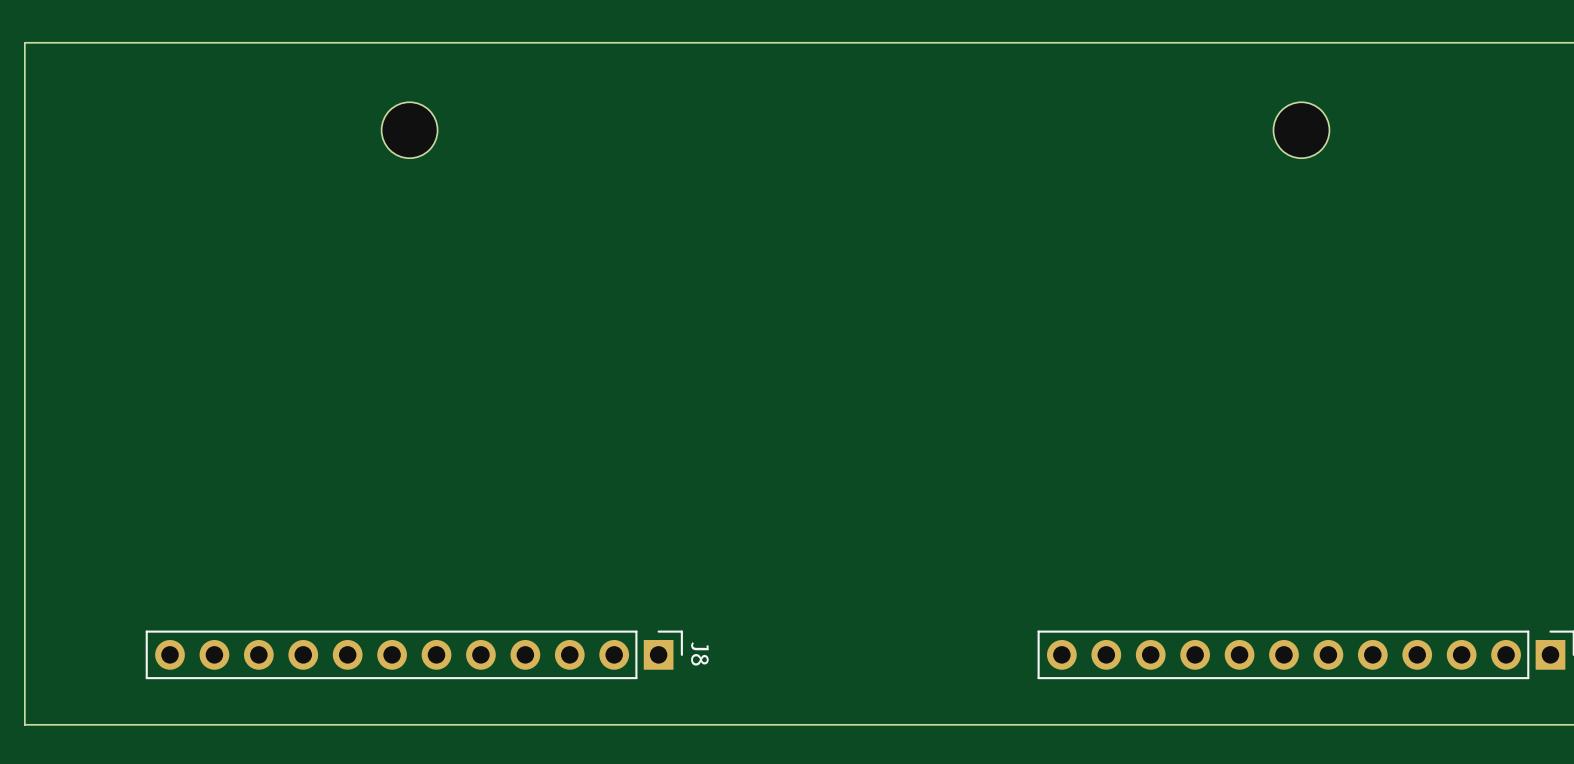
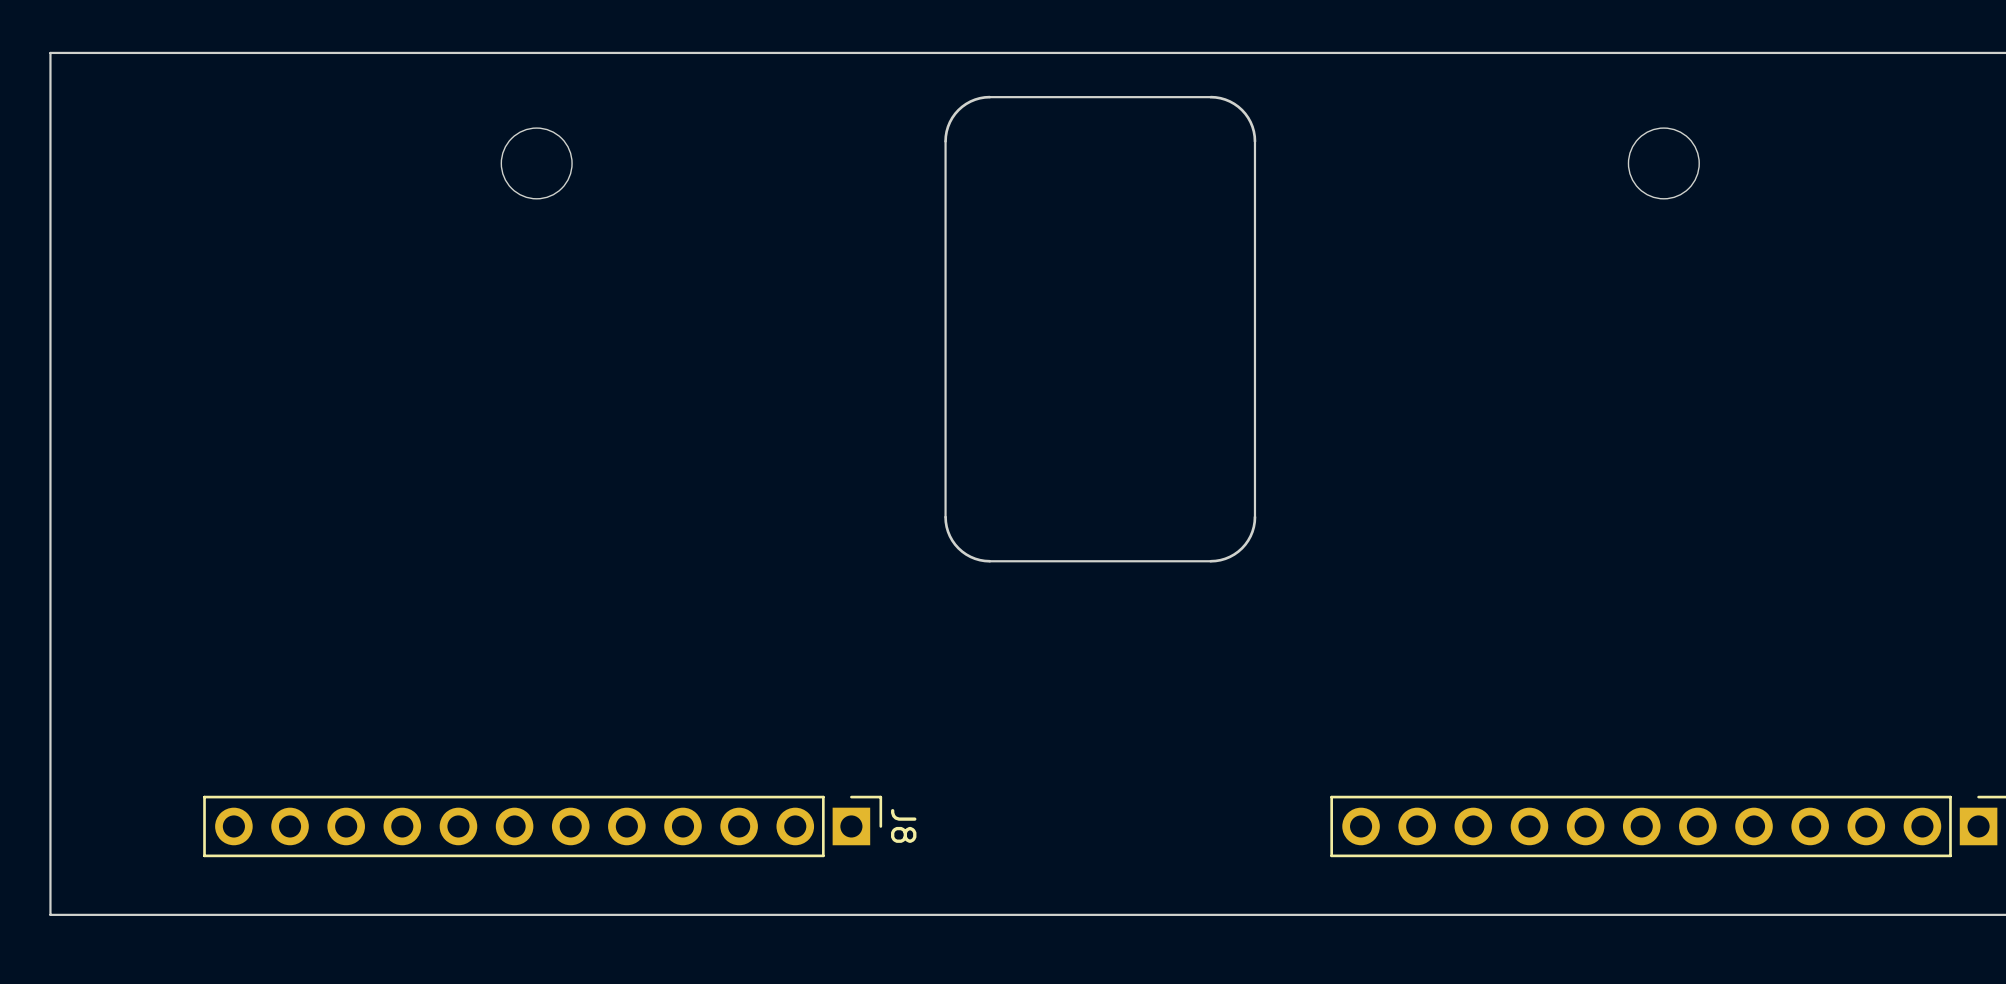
part: none -> (1100, 329)

